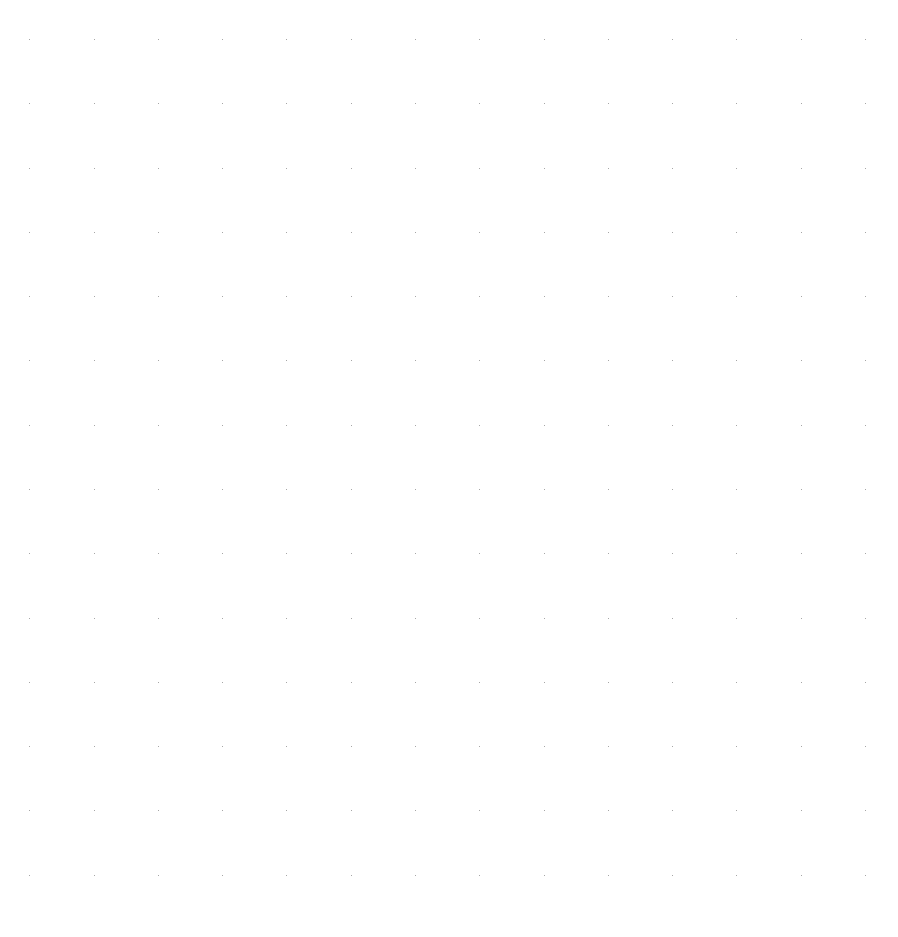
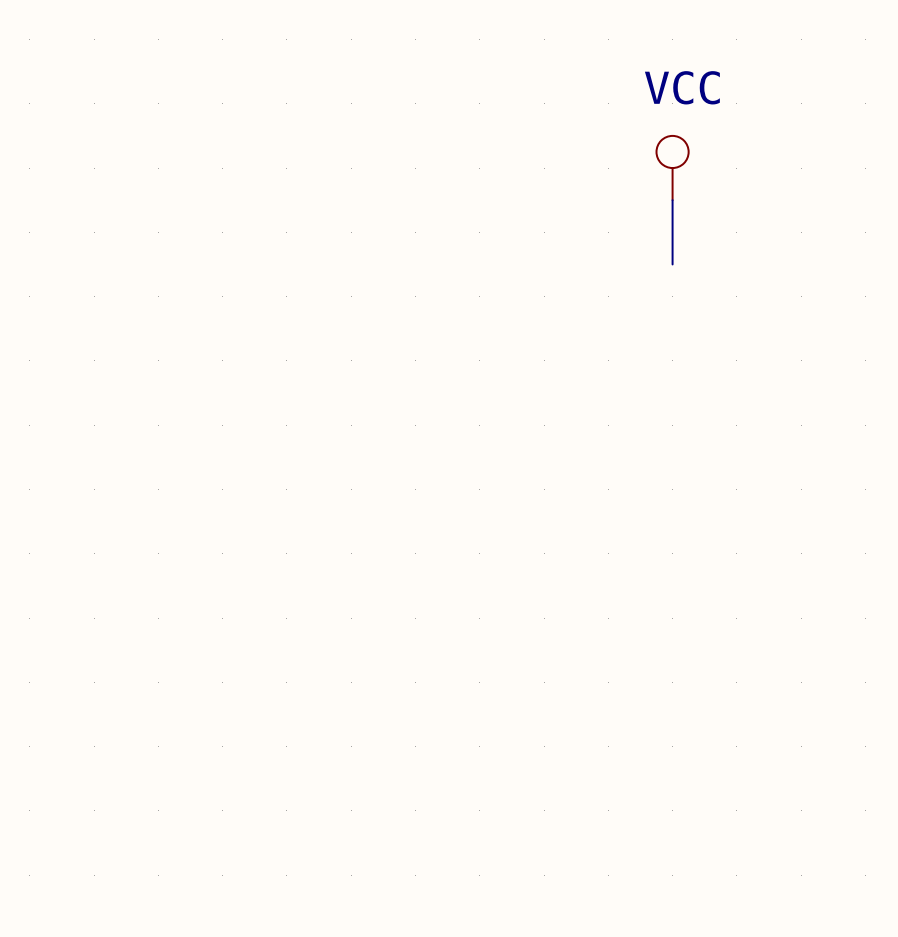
power symbol: none -> VCC (672, 168)
wire: none -> (672, 200) (672, 264)

